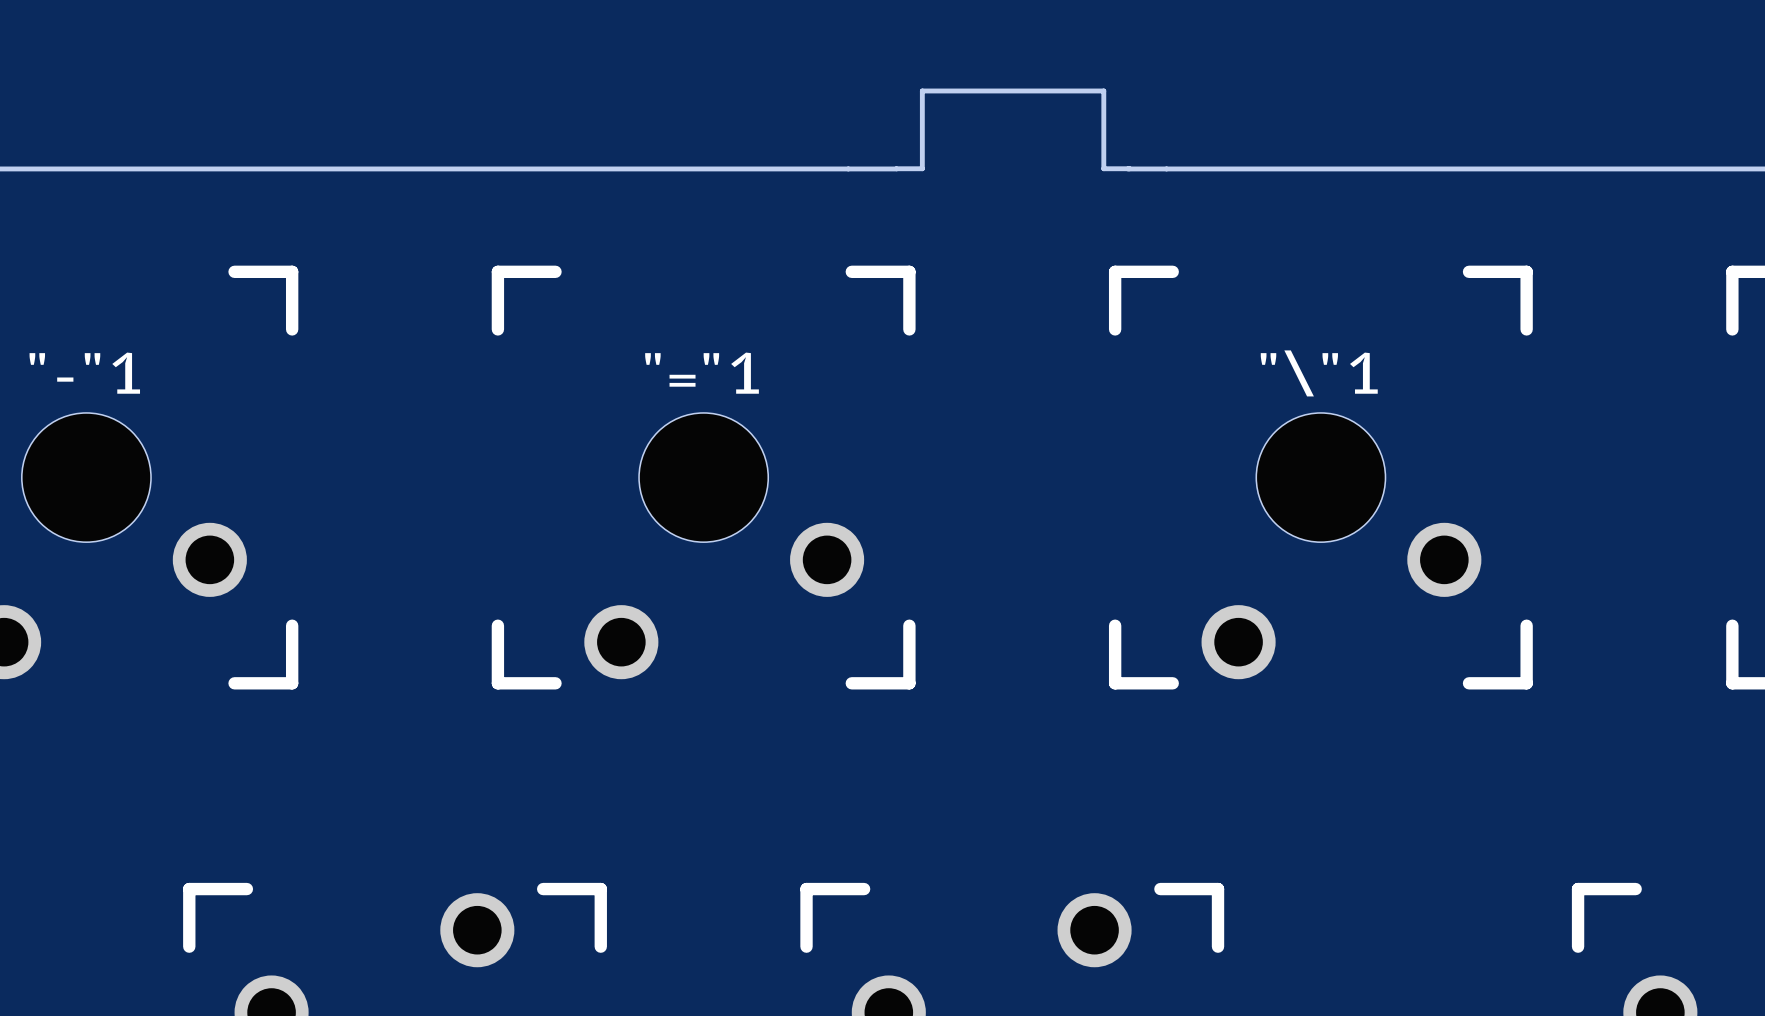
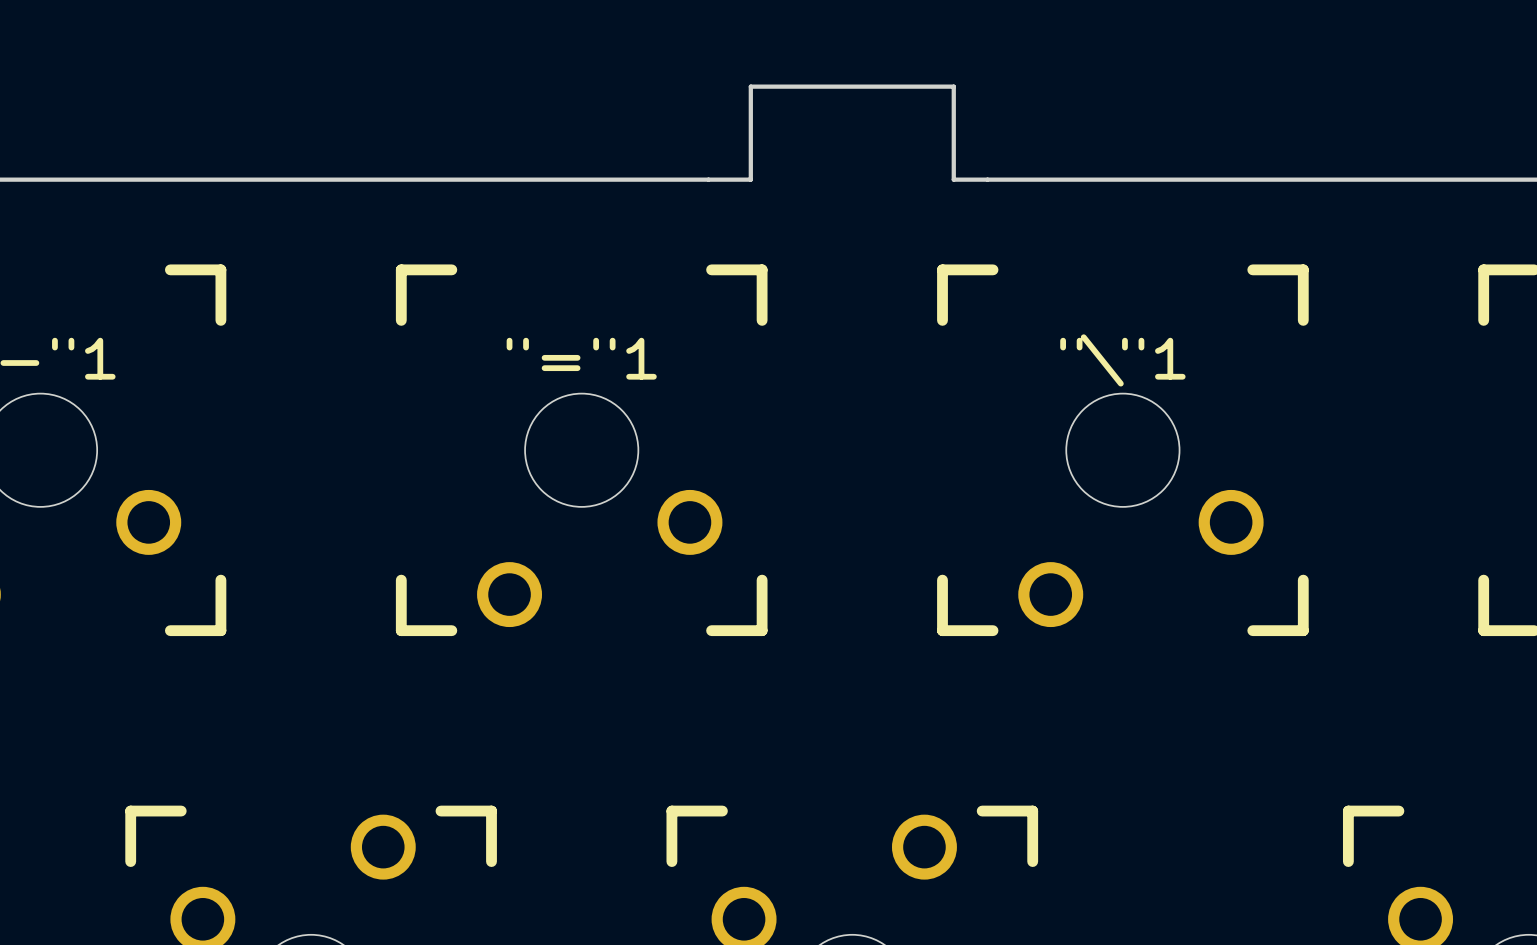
board edge: (896, 168) (922, 168) (922, 90) (1103, 90) (1103, 168) (1129, 168) -> (750, 179) (750, 86) (953, 86) (953, 179)

